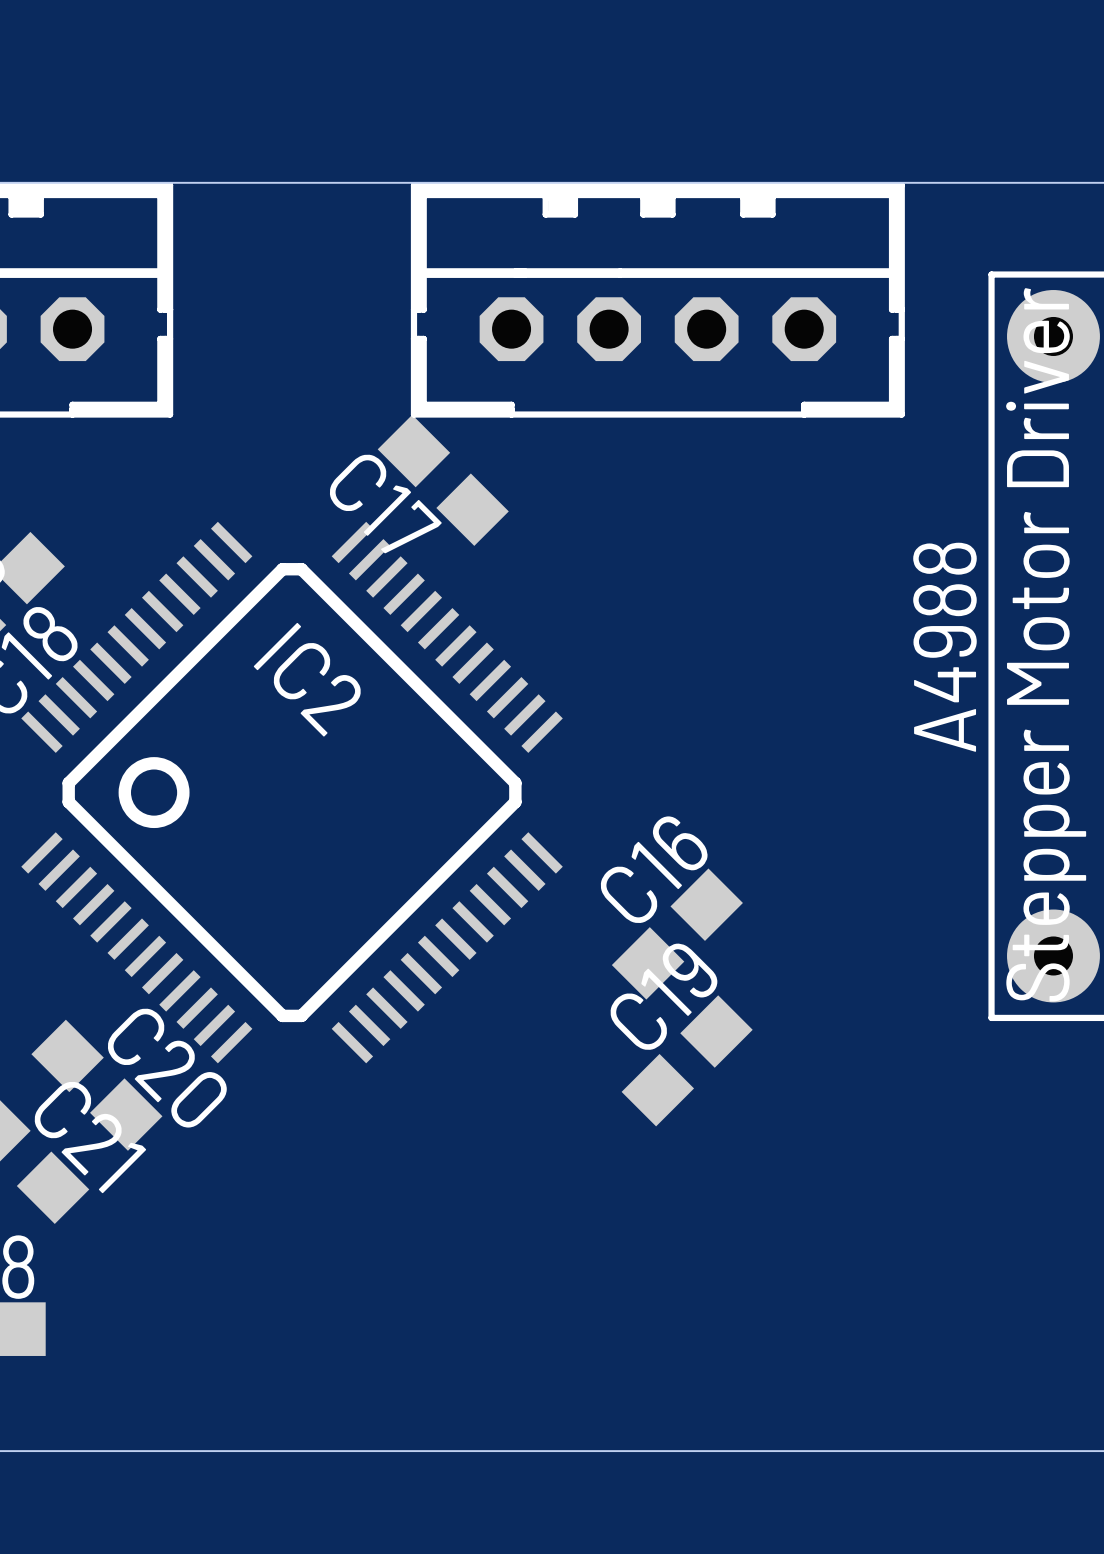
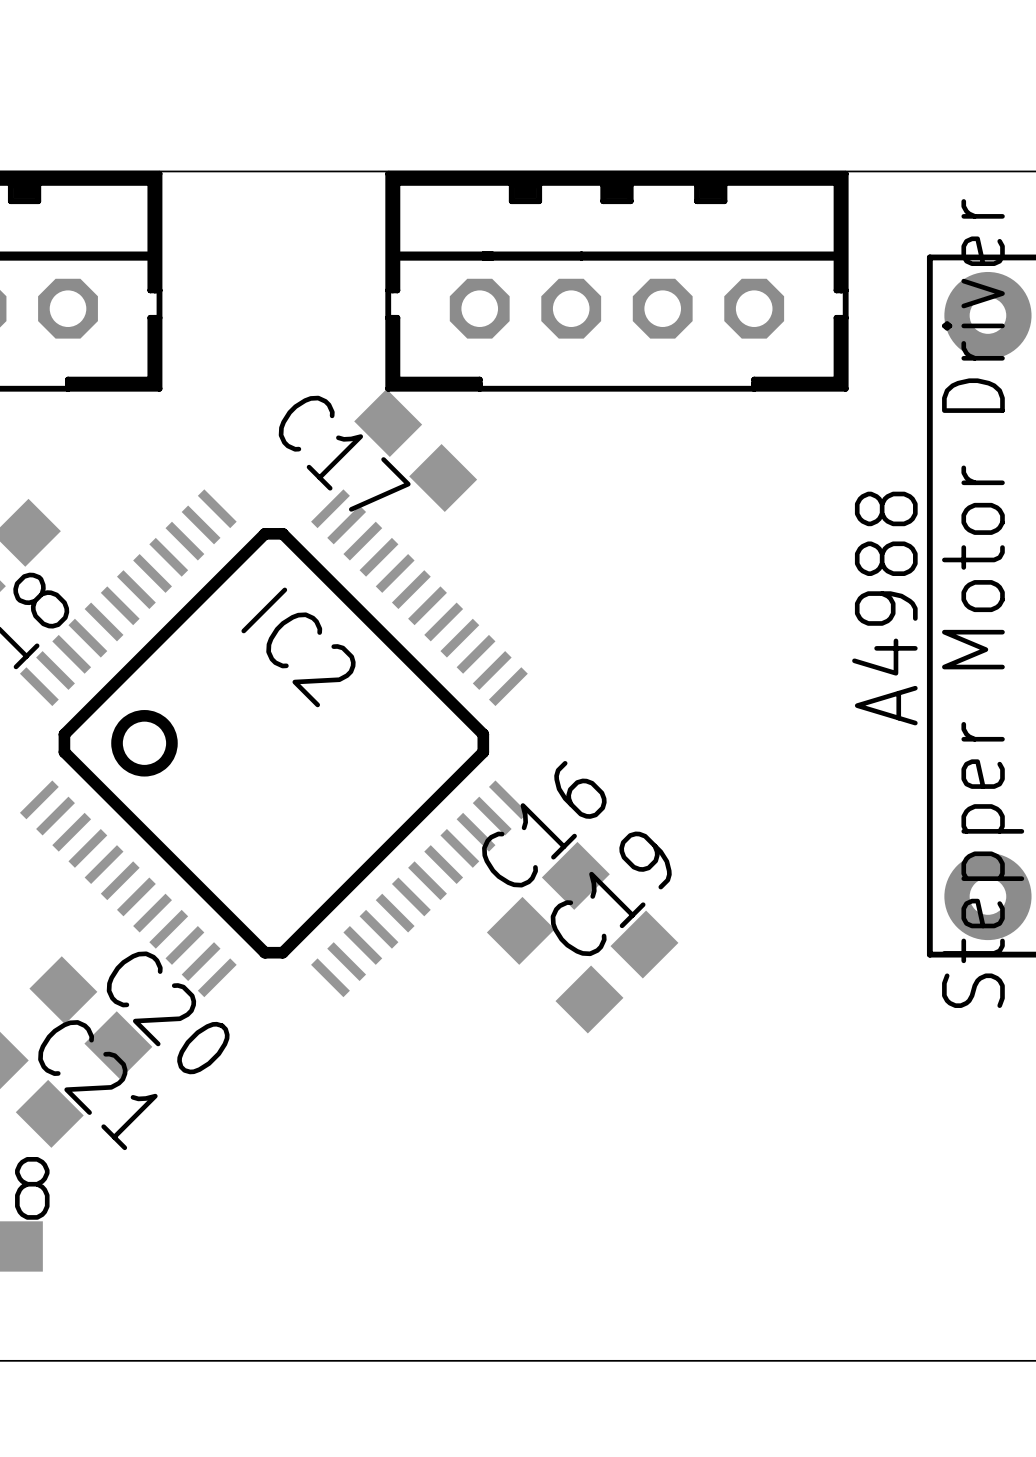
C16 position: (677, 934) -> (548, 903)
C19 position: (687, 1060) -> (616, 972)

